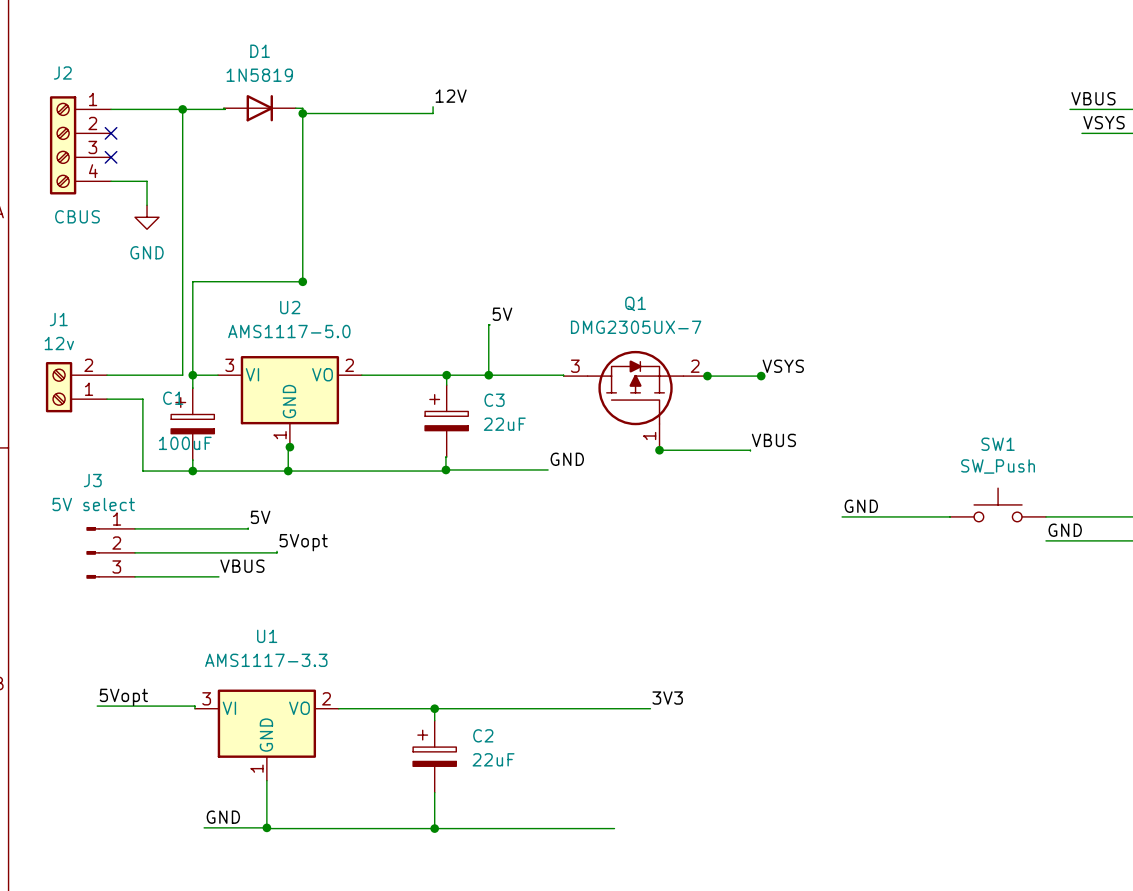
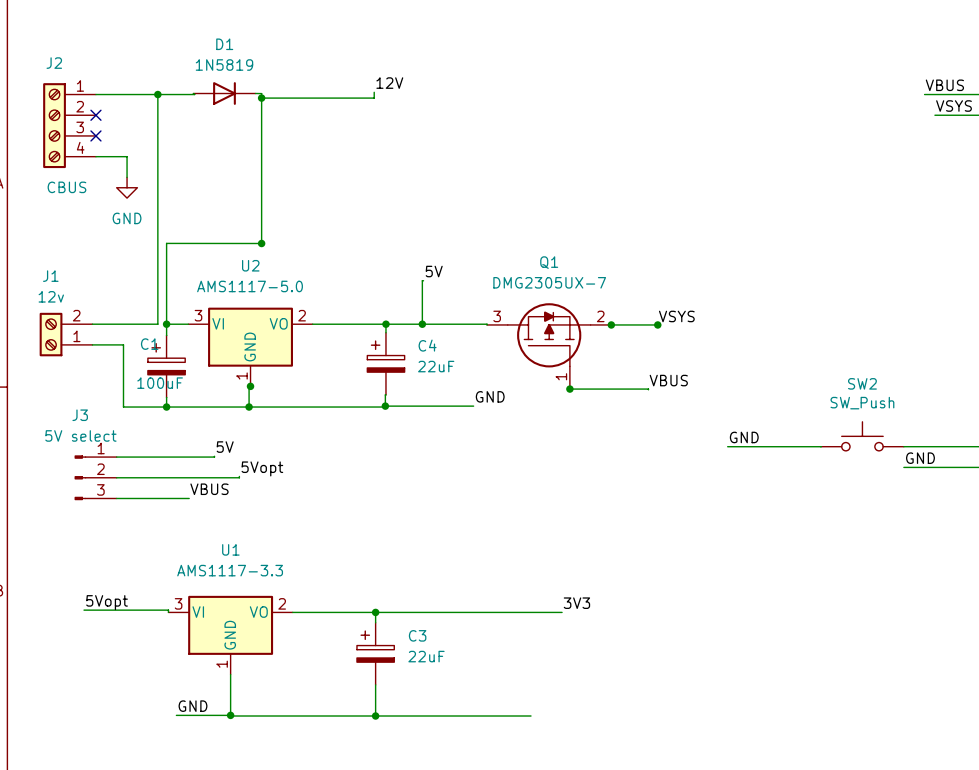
C3 name: C3 (494, 400) -> C4 (427, 345)
SW1 name: SW1 (998, 444) -> SW2 (862, 383)
C2 name: C2 (483, 735) -> C3 (417, 635)

